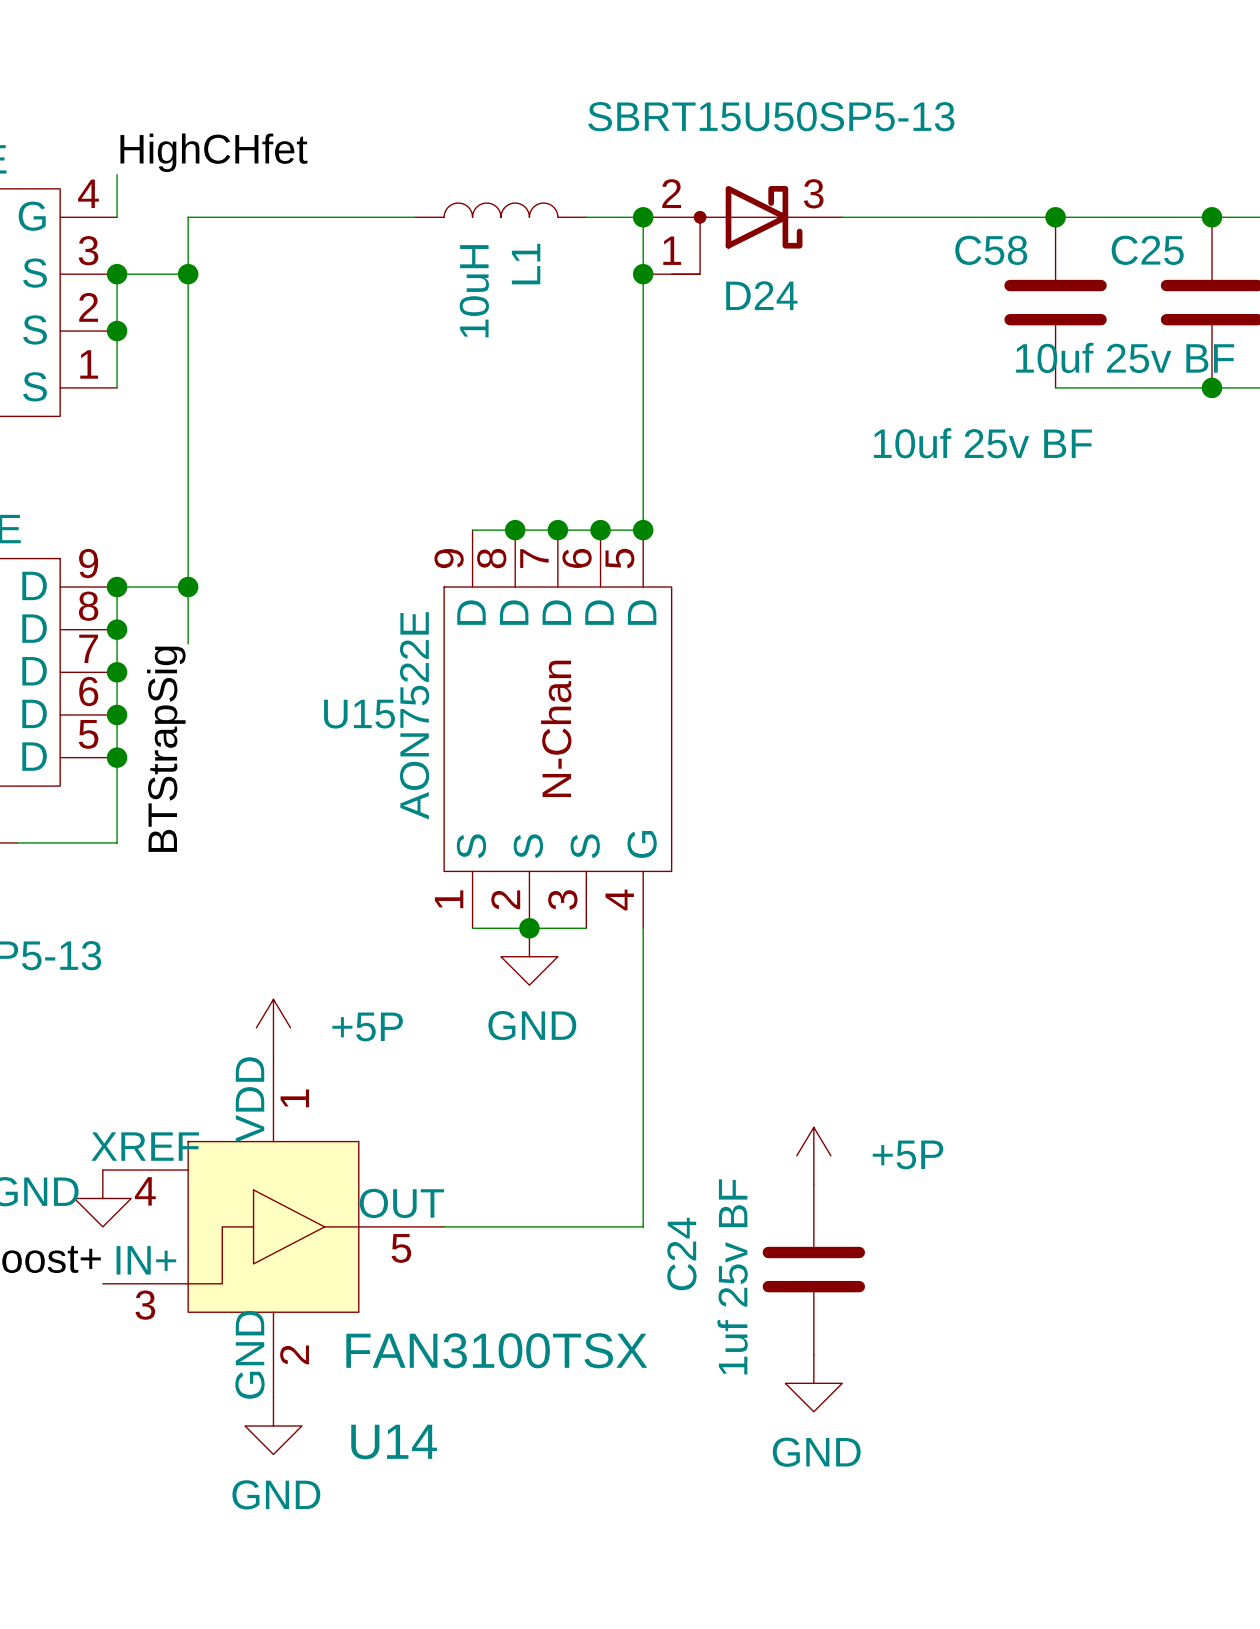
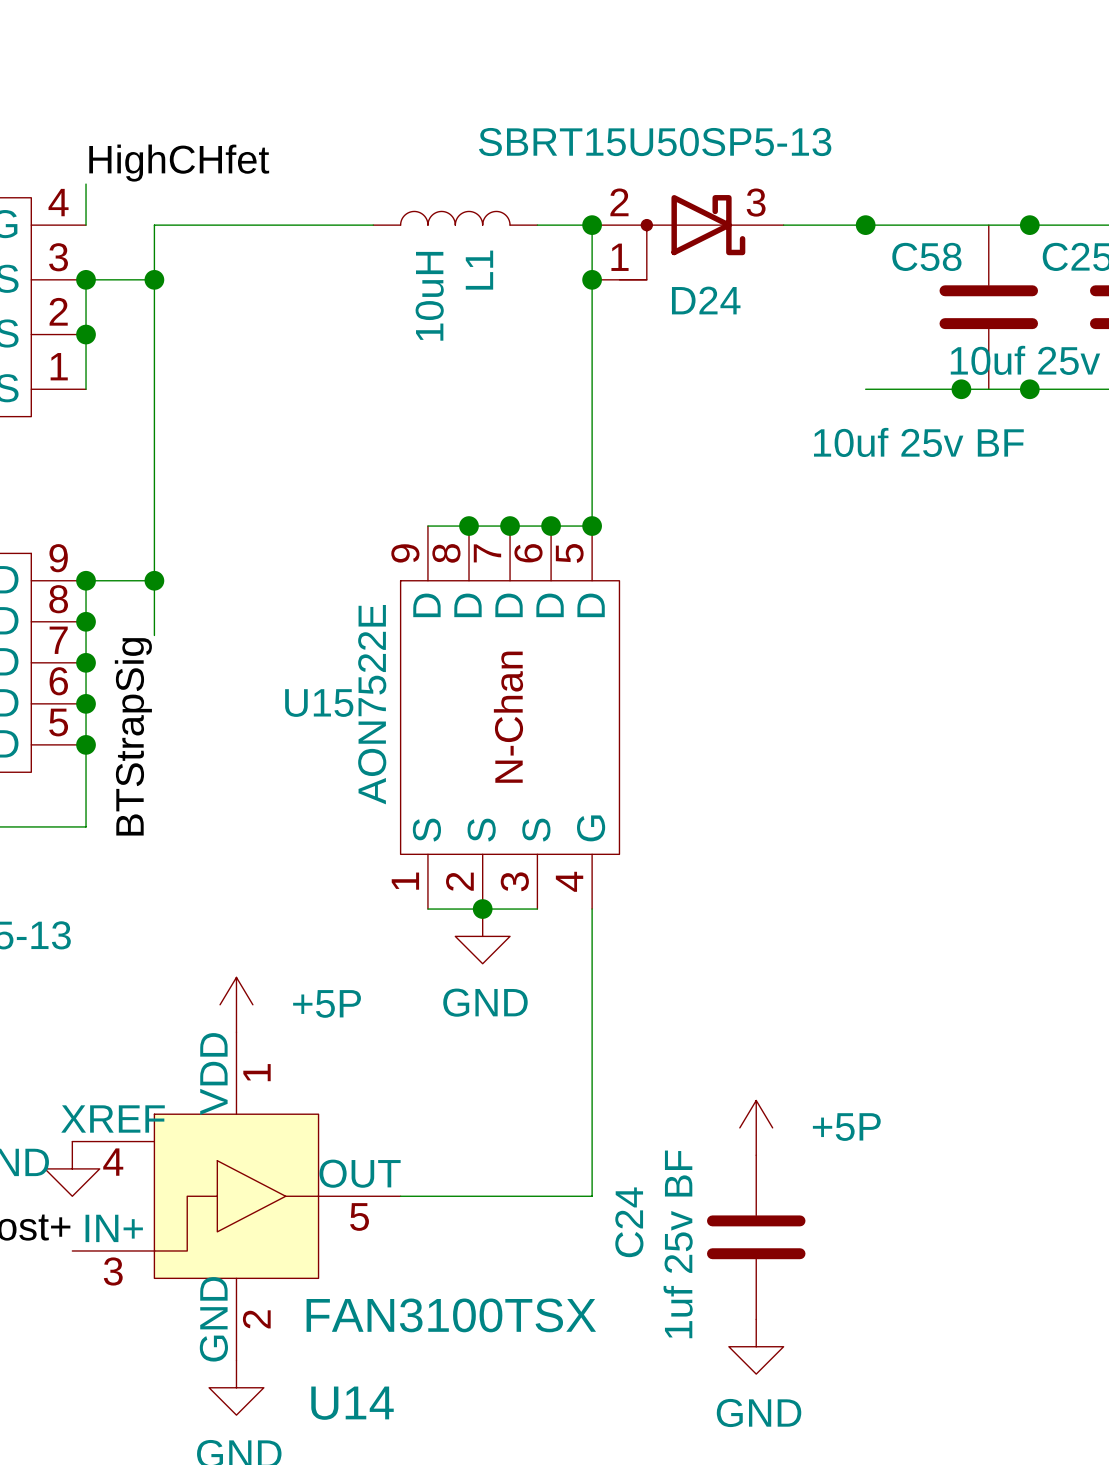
D24 value position: SBRT15U50SP5-13 (771, 116) -> SBRT15U50SP5-13 (655, 142)
junction: none -> (865, 225)
junction position: (1055, 217) -> (1029, 225)
wire: none -> (865, 389) (988, 389)
junction: none -> (961, 389)
junction: none -> (1029, 389)

